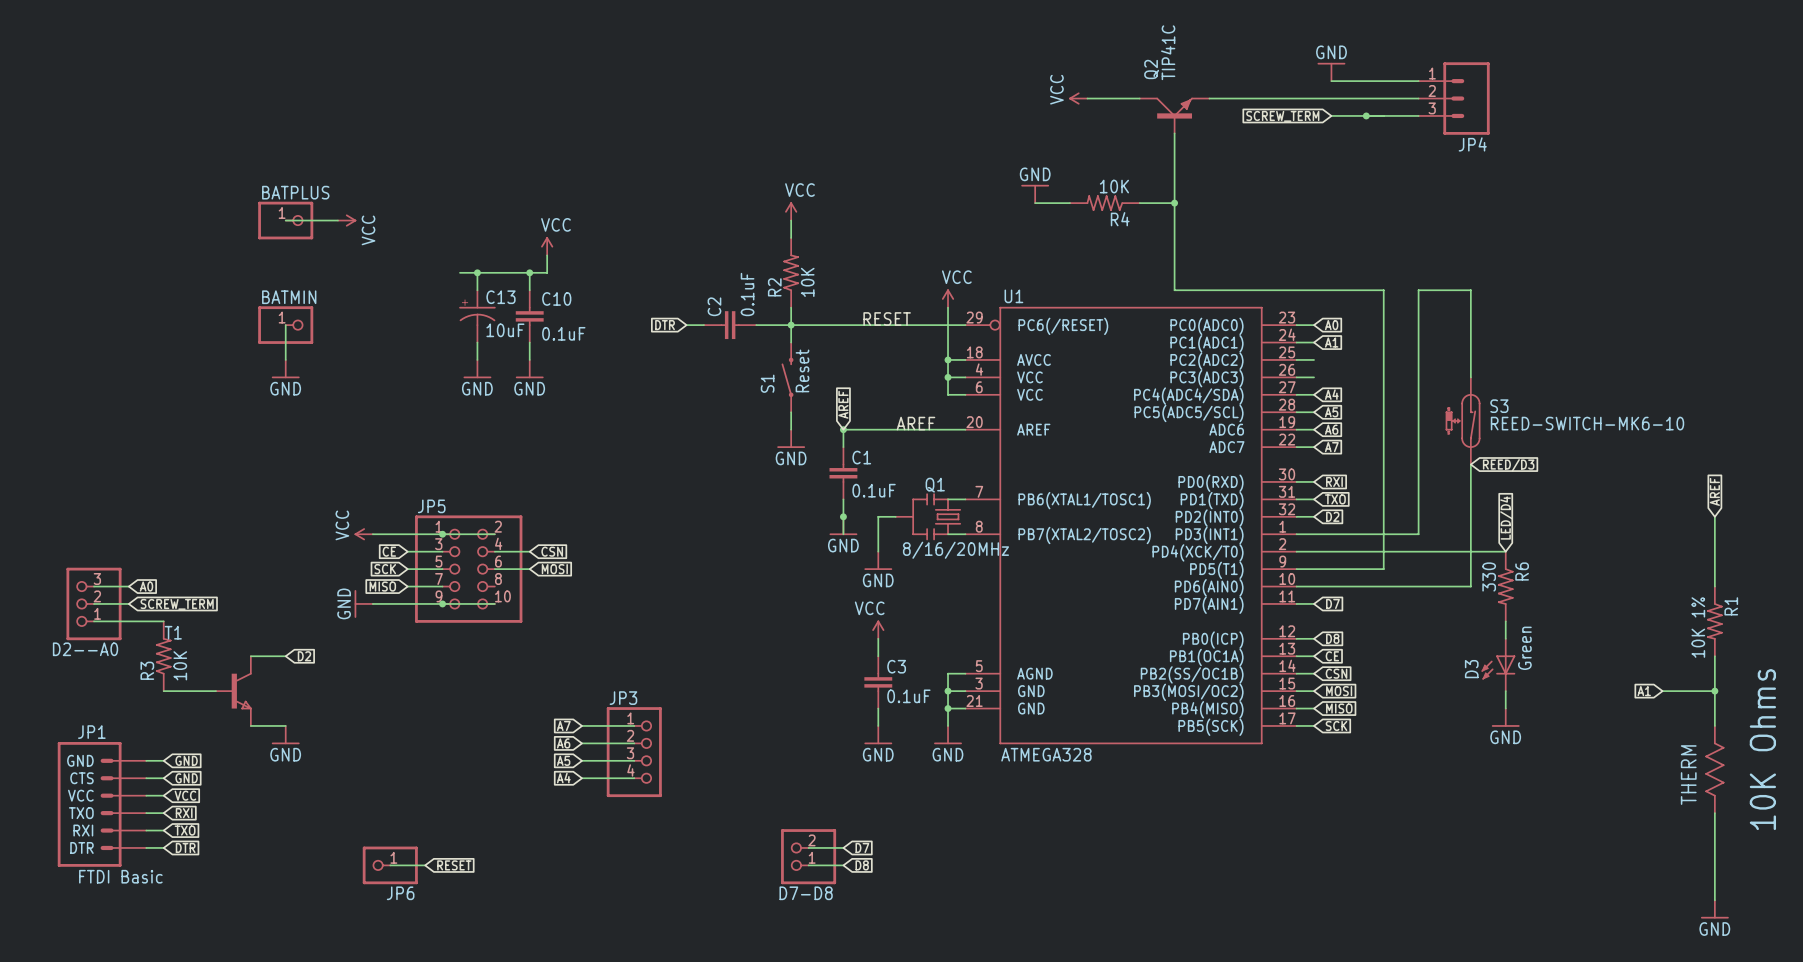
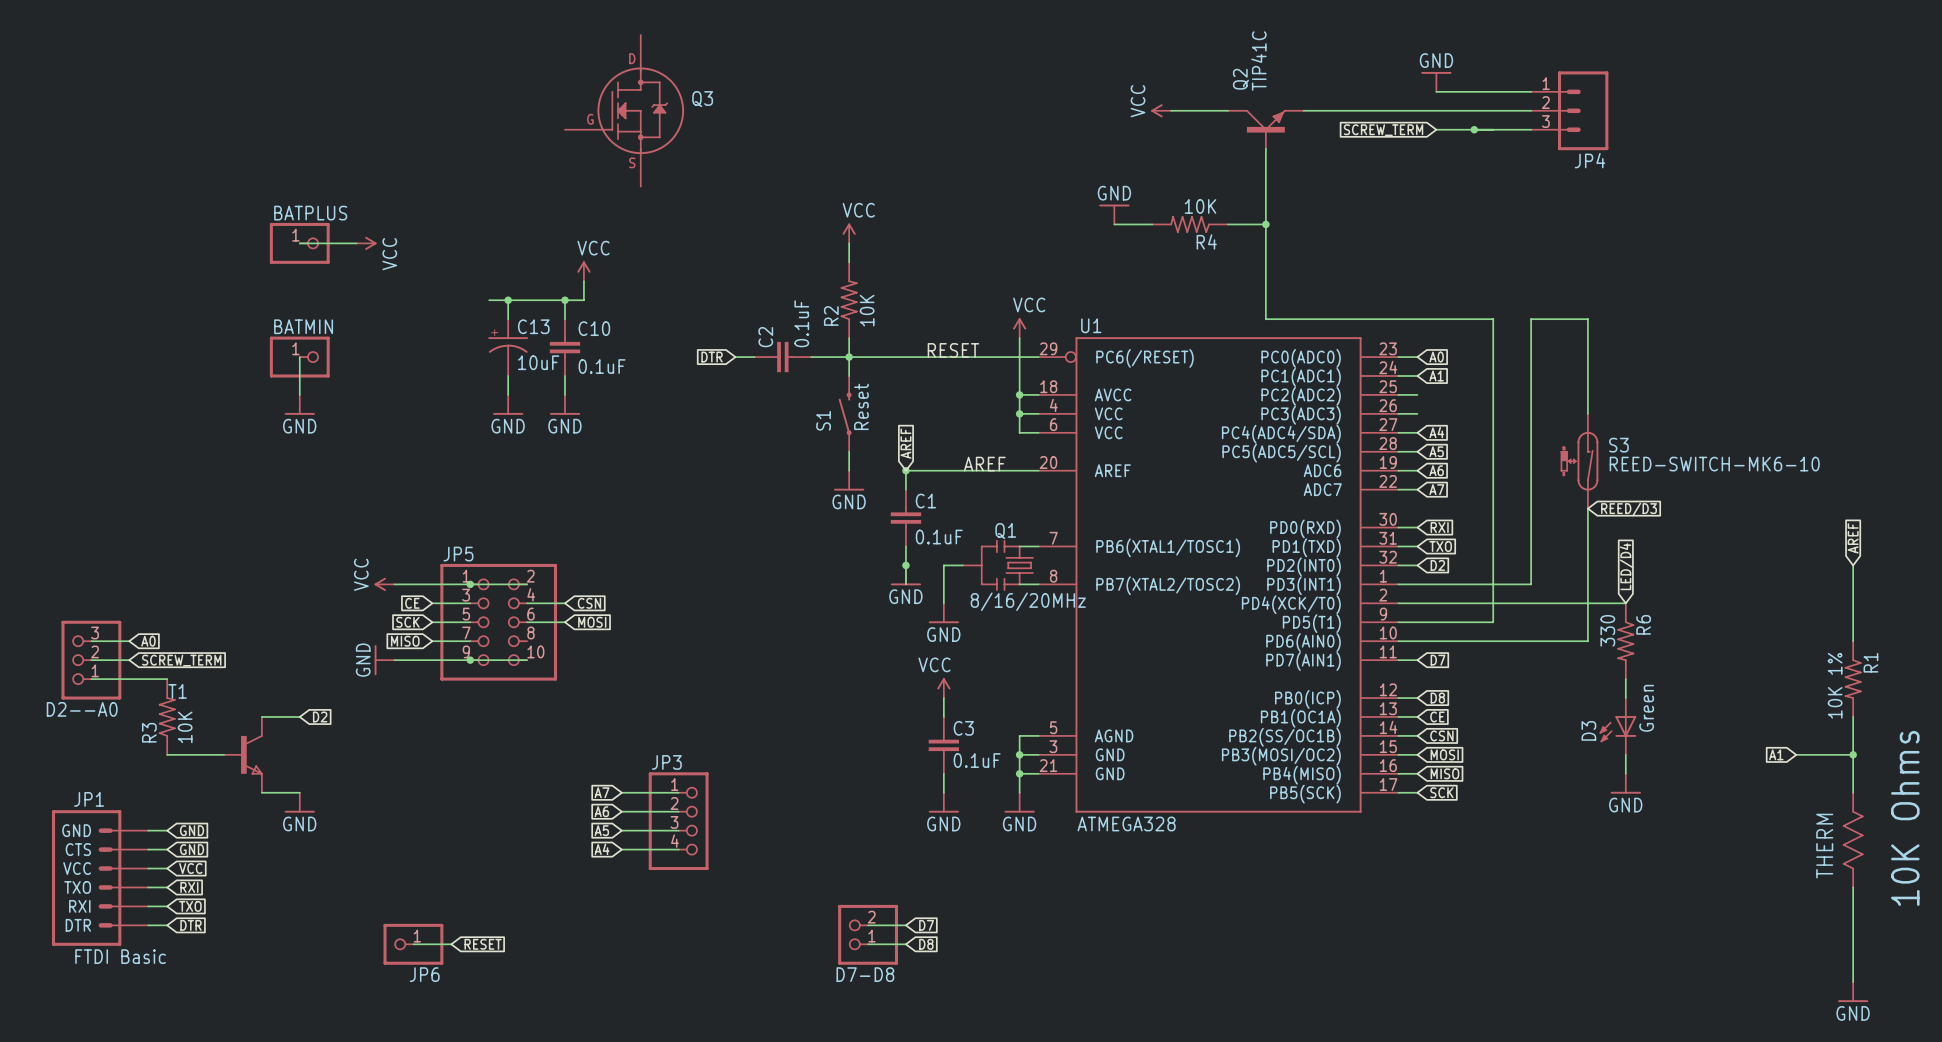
Q3: none -> (624, 110)

